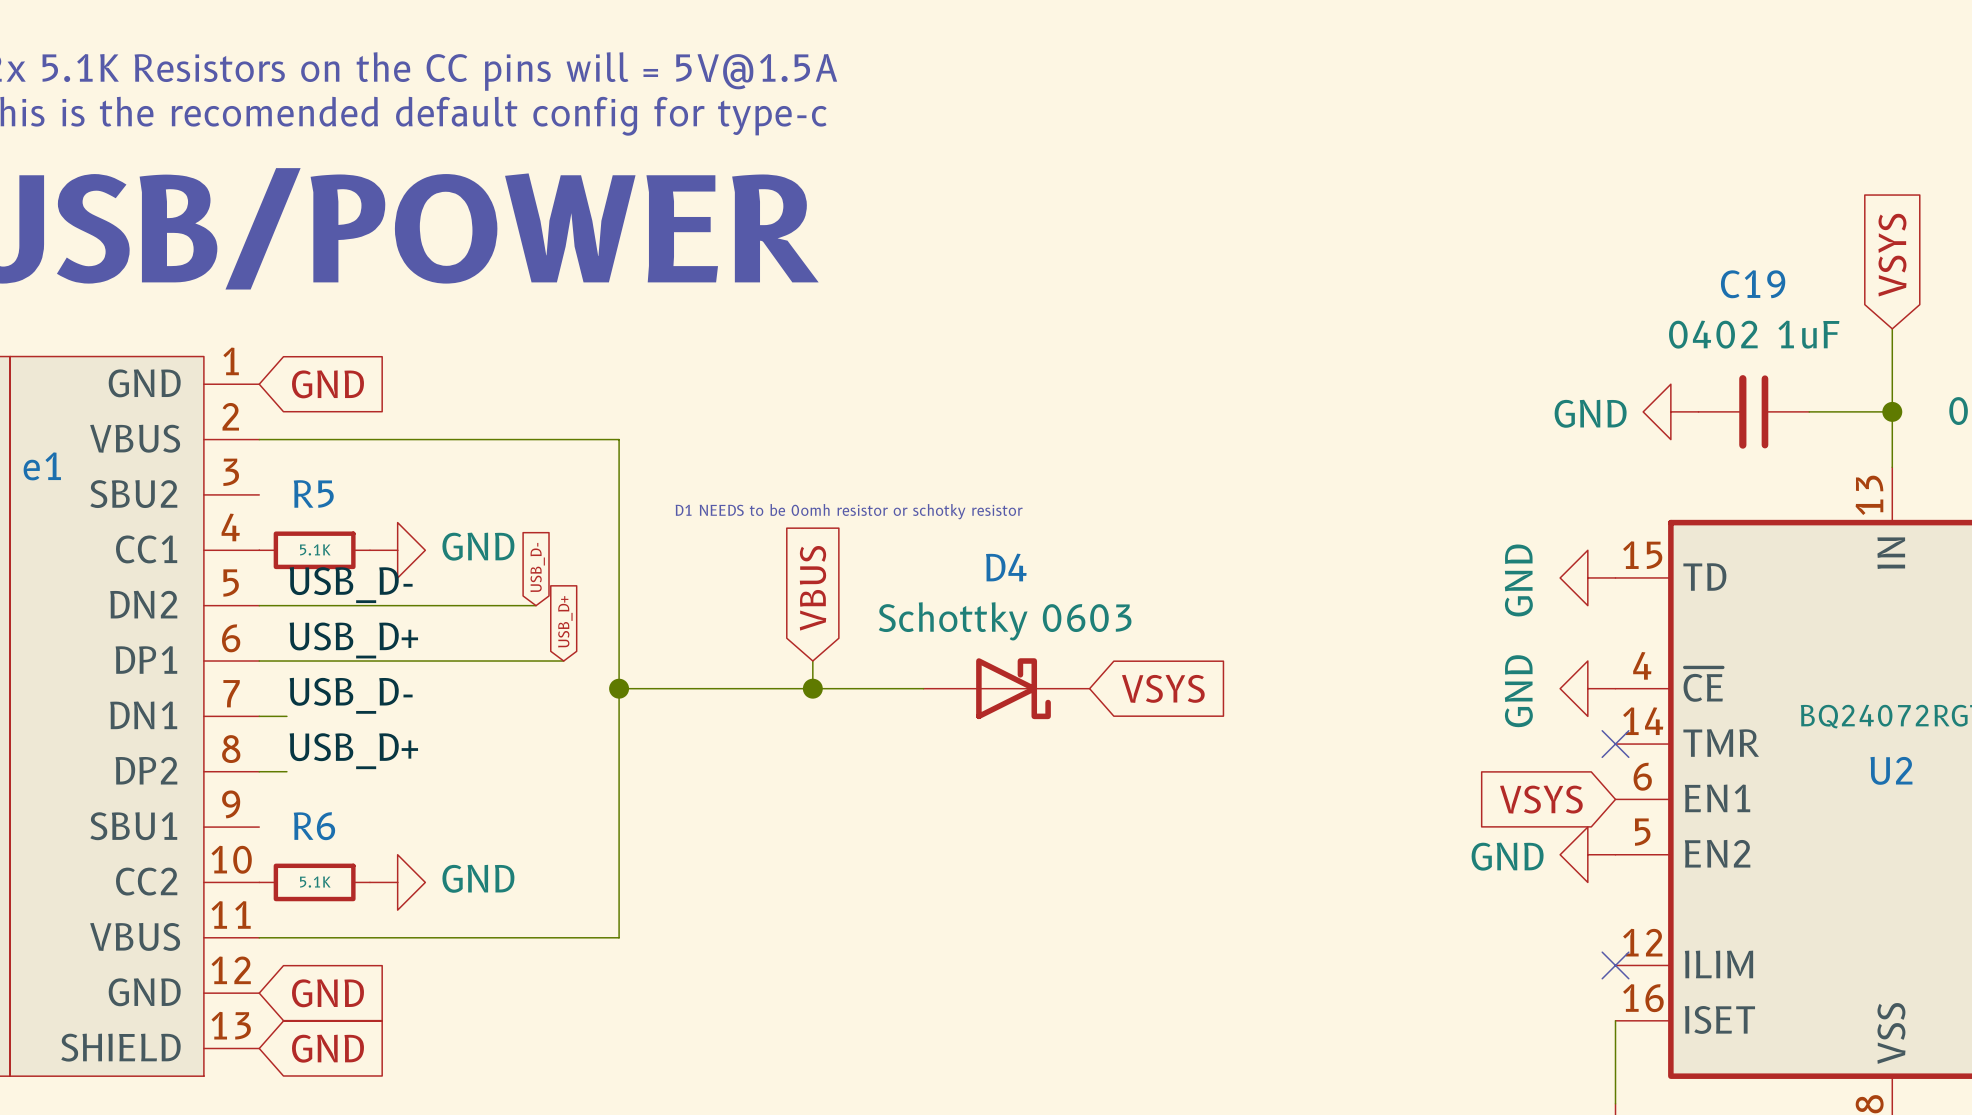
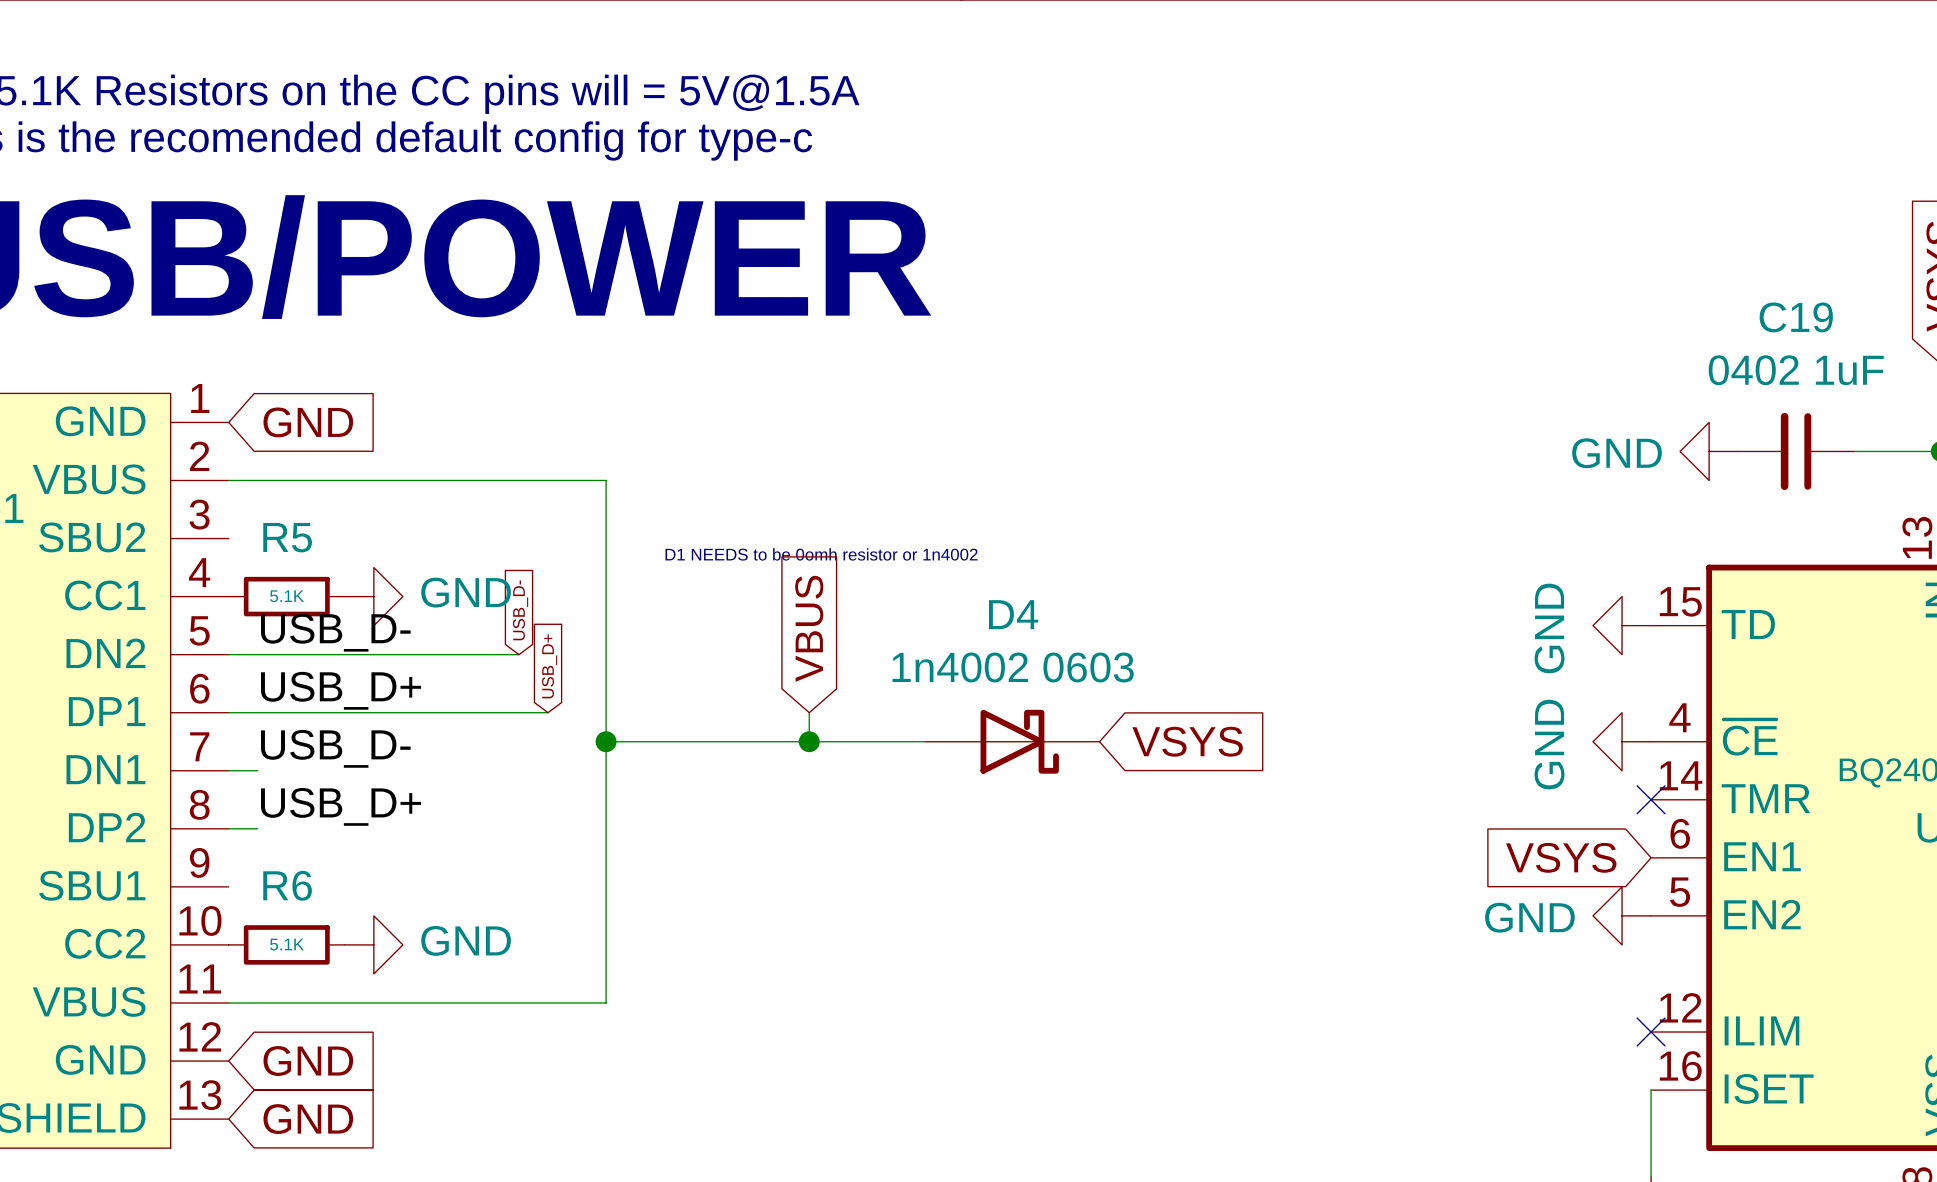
text: D1 NEEDS to be 0omh resistor or schotky resistor (849, 511) -> D1 NEEDS to be 0omh resistor or 1n4002 (821, 554)
D4 value: Schottky 0603 (1005, 621) -> 1n4002 0603 (1013, 667)

